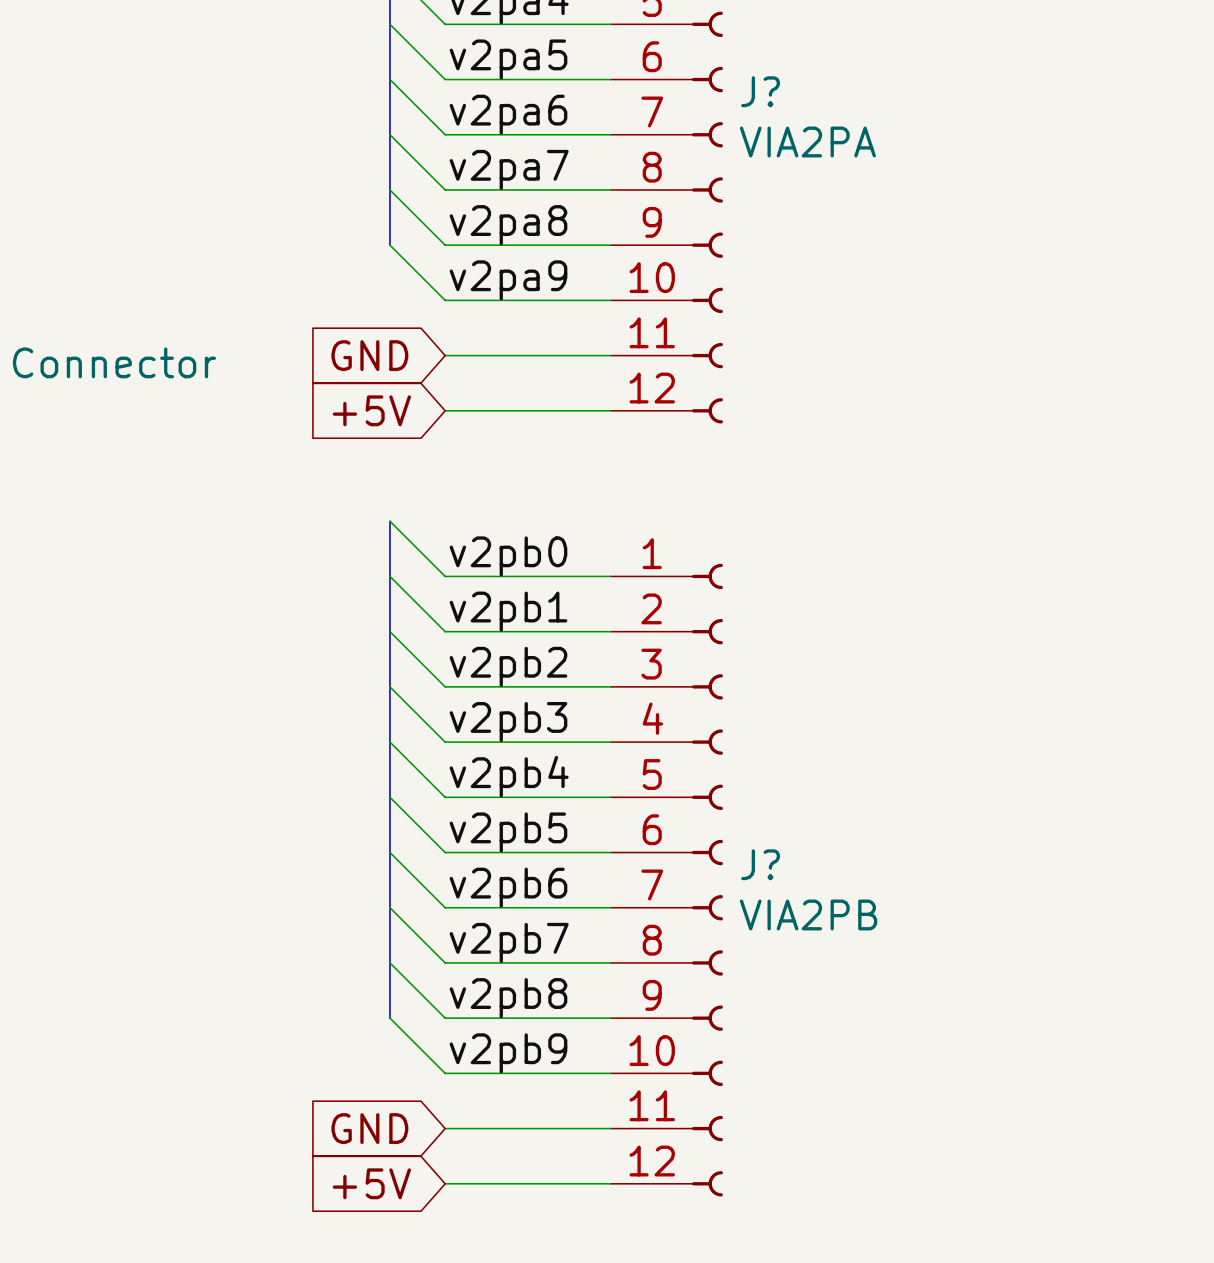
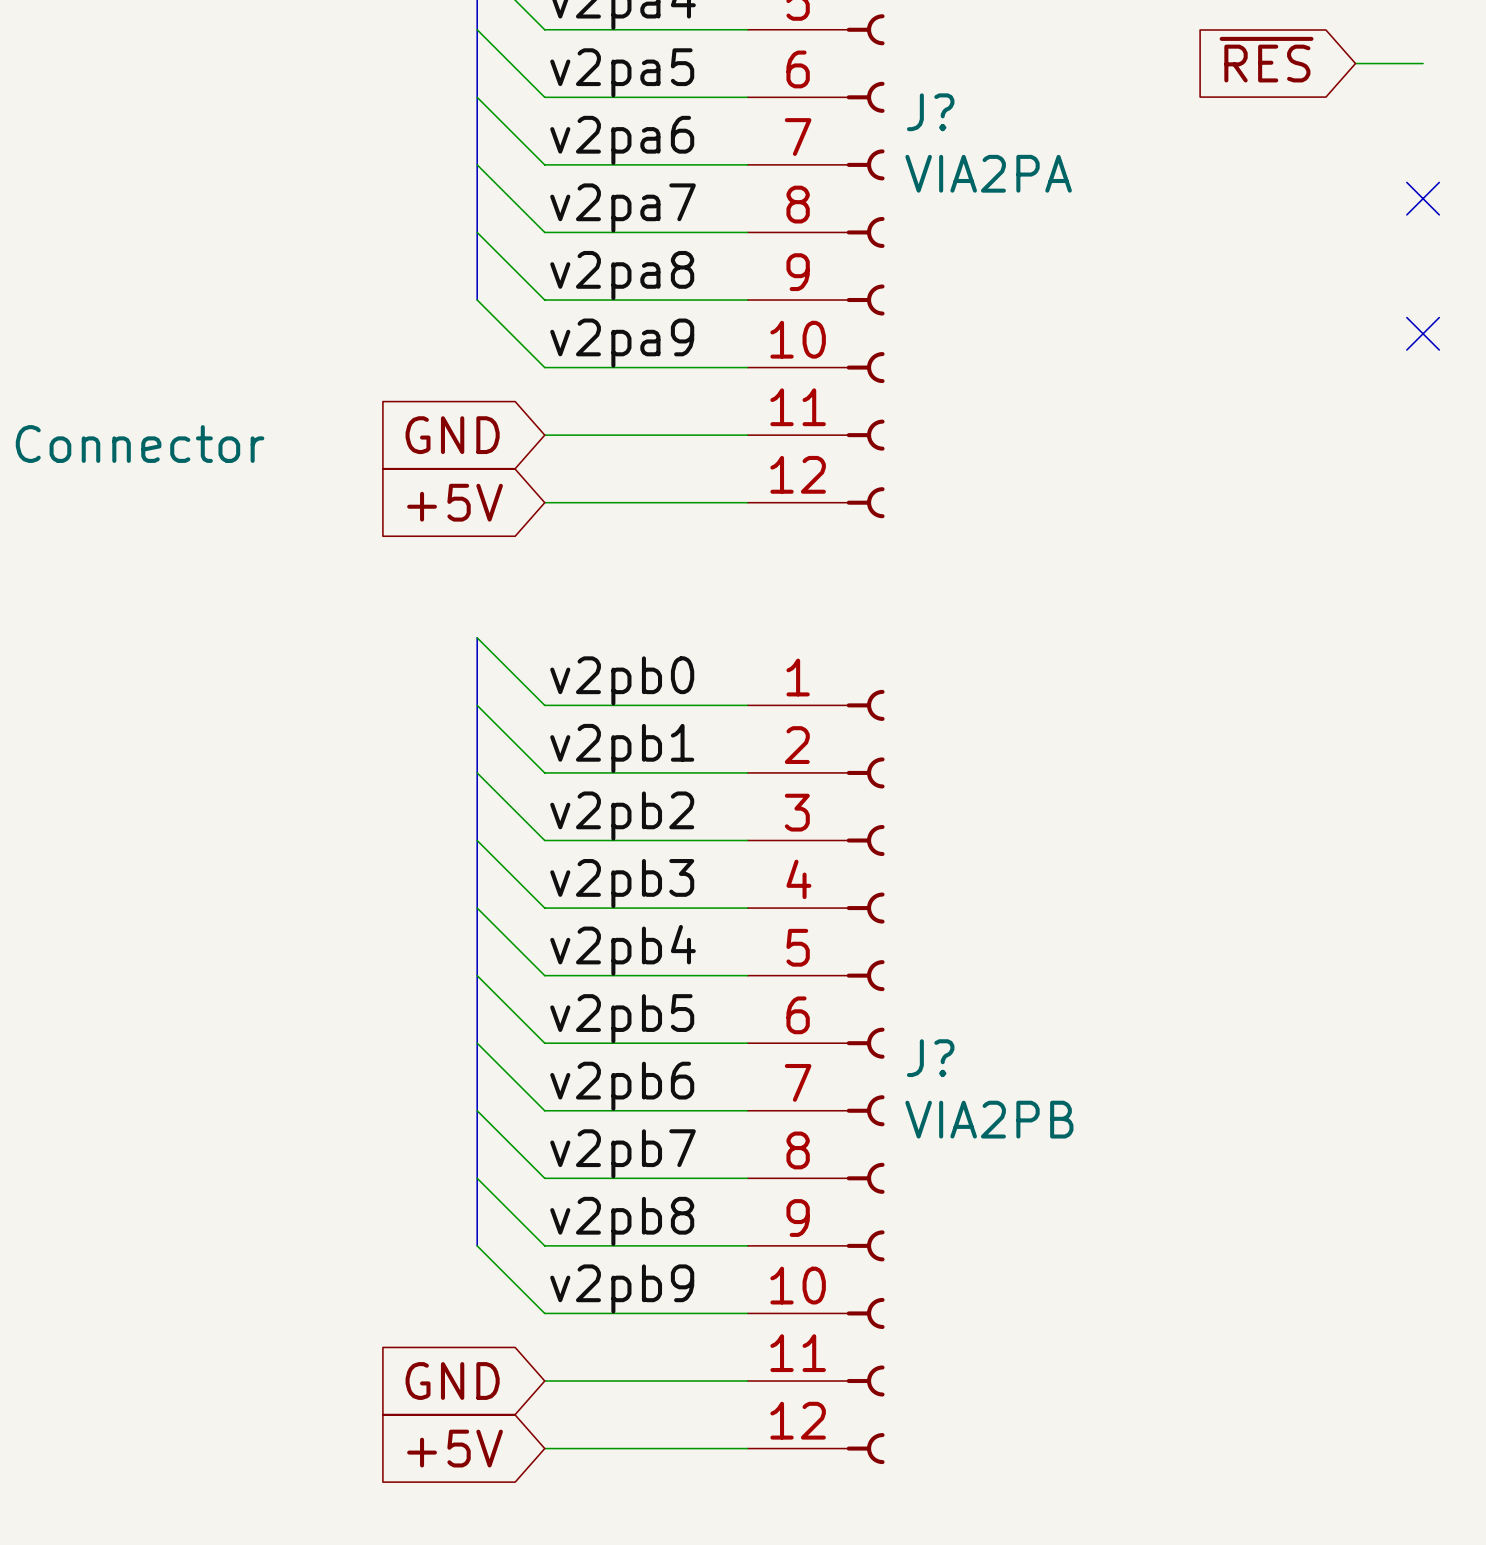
global label: none -> ~{RES} (1266, 59)
wire: none -> (1355, 63) (1423, 63)
no-connect mark: none -> (1423, 198)
no-connect mark: none -> (1423, 333)

